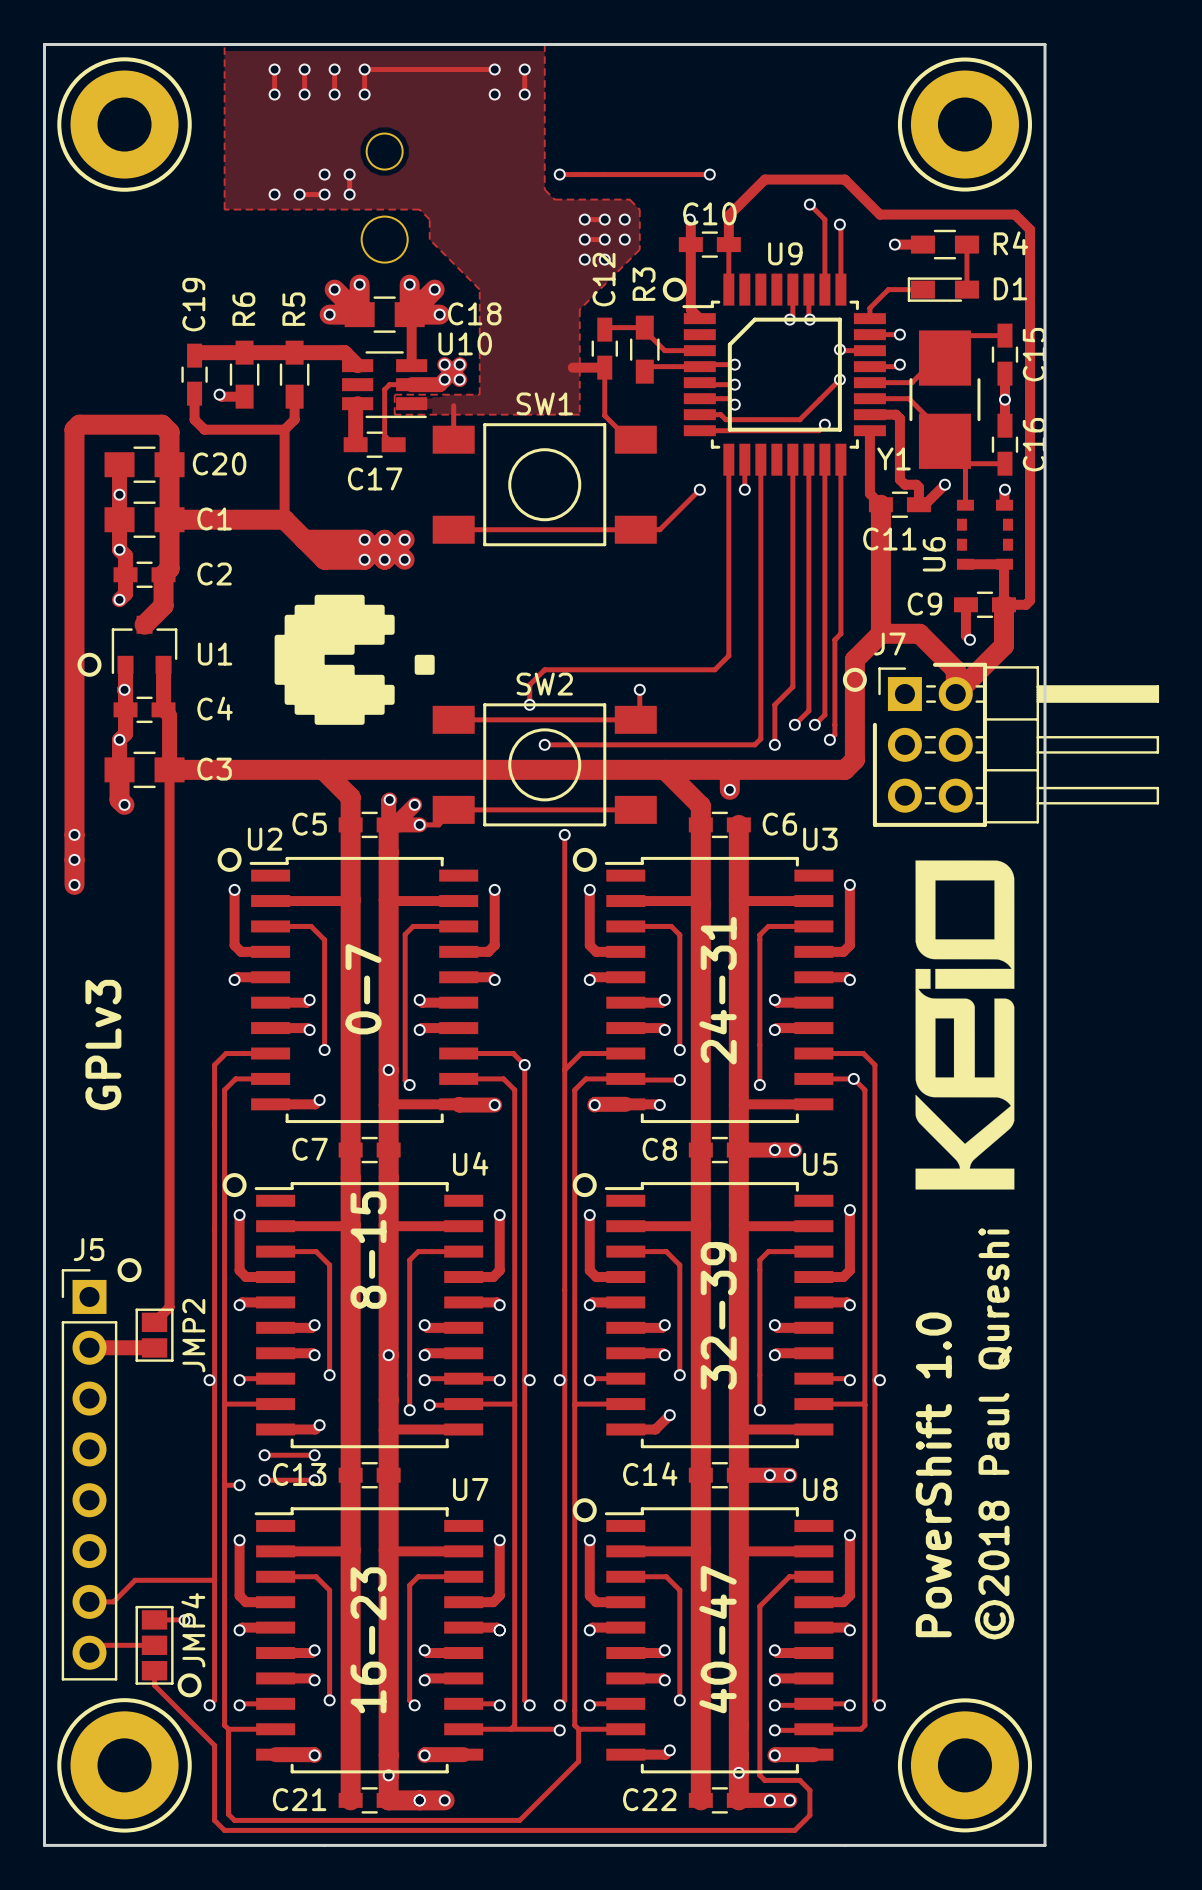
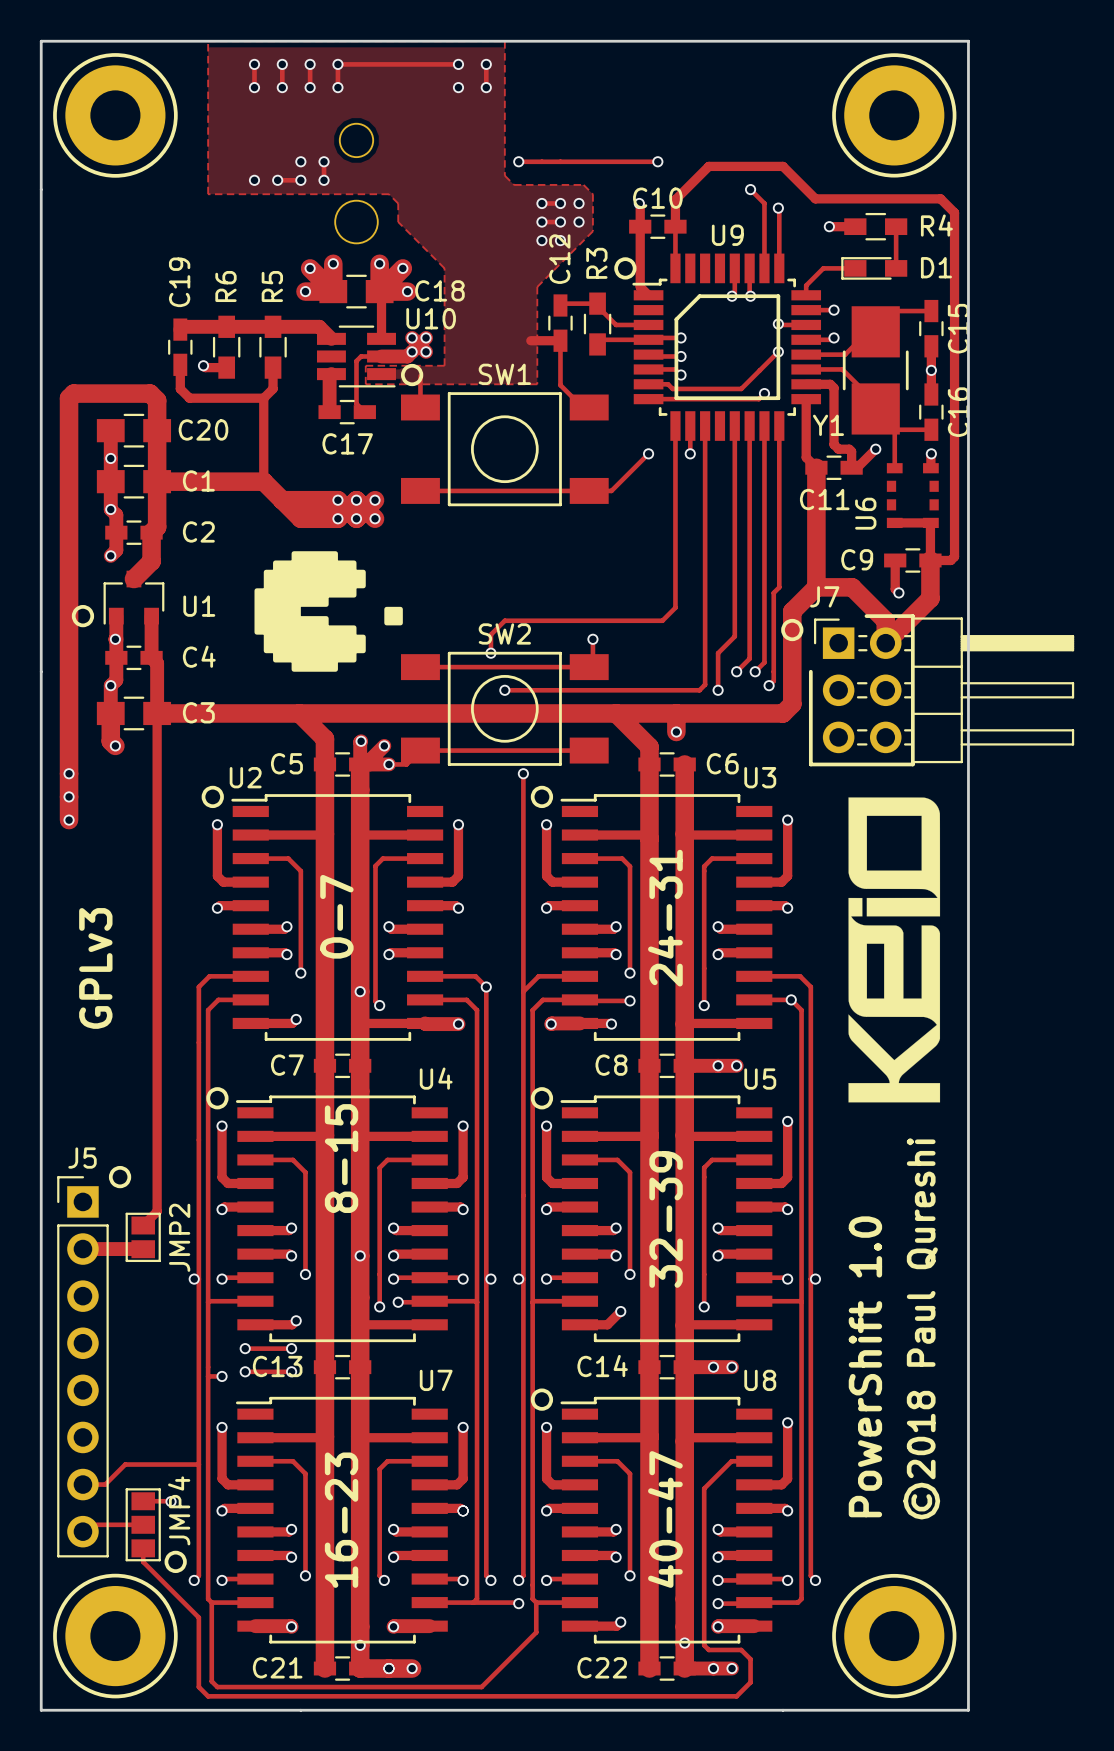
drawing: none -> [400, 363, 424, 387]

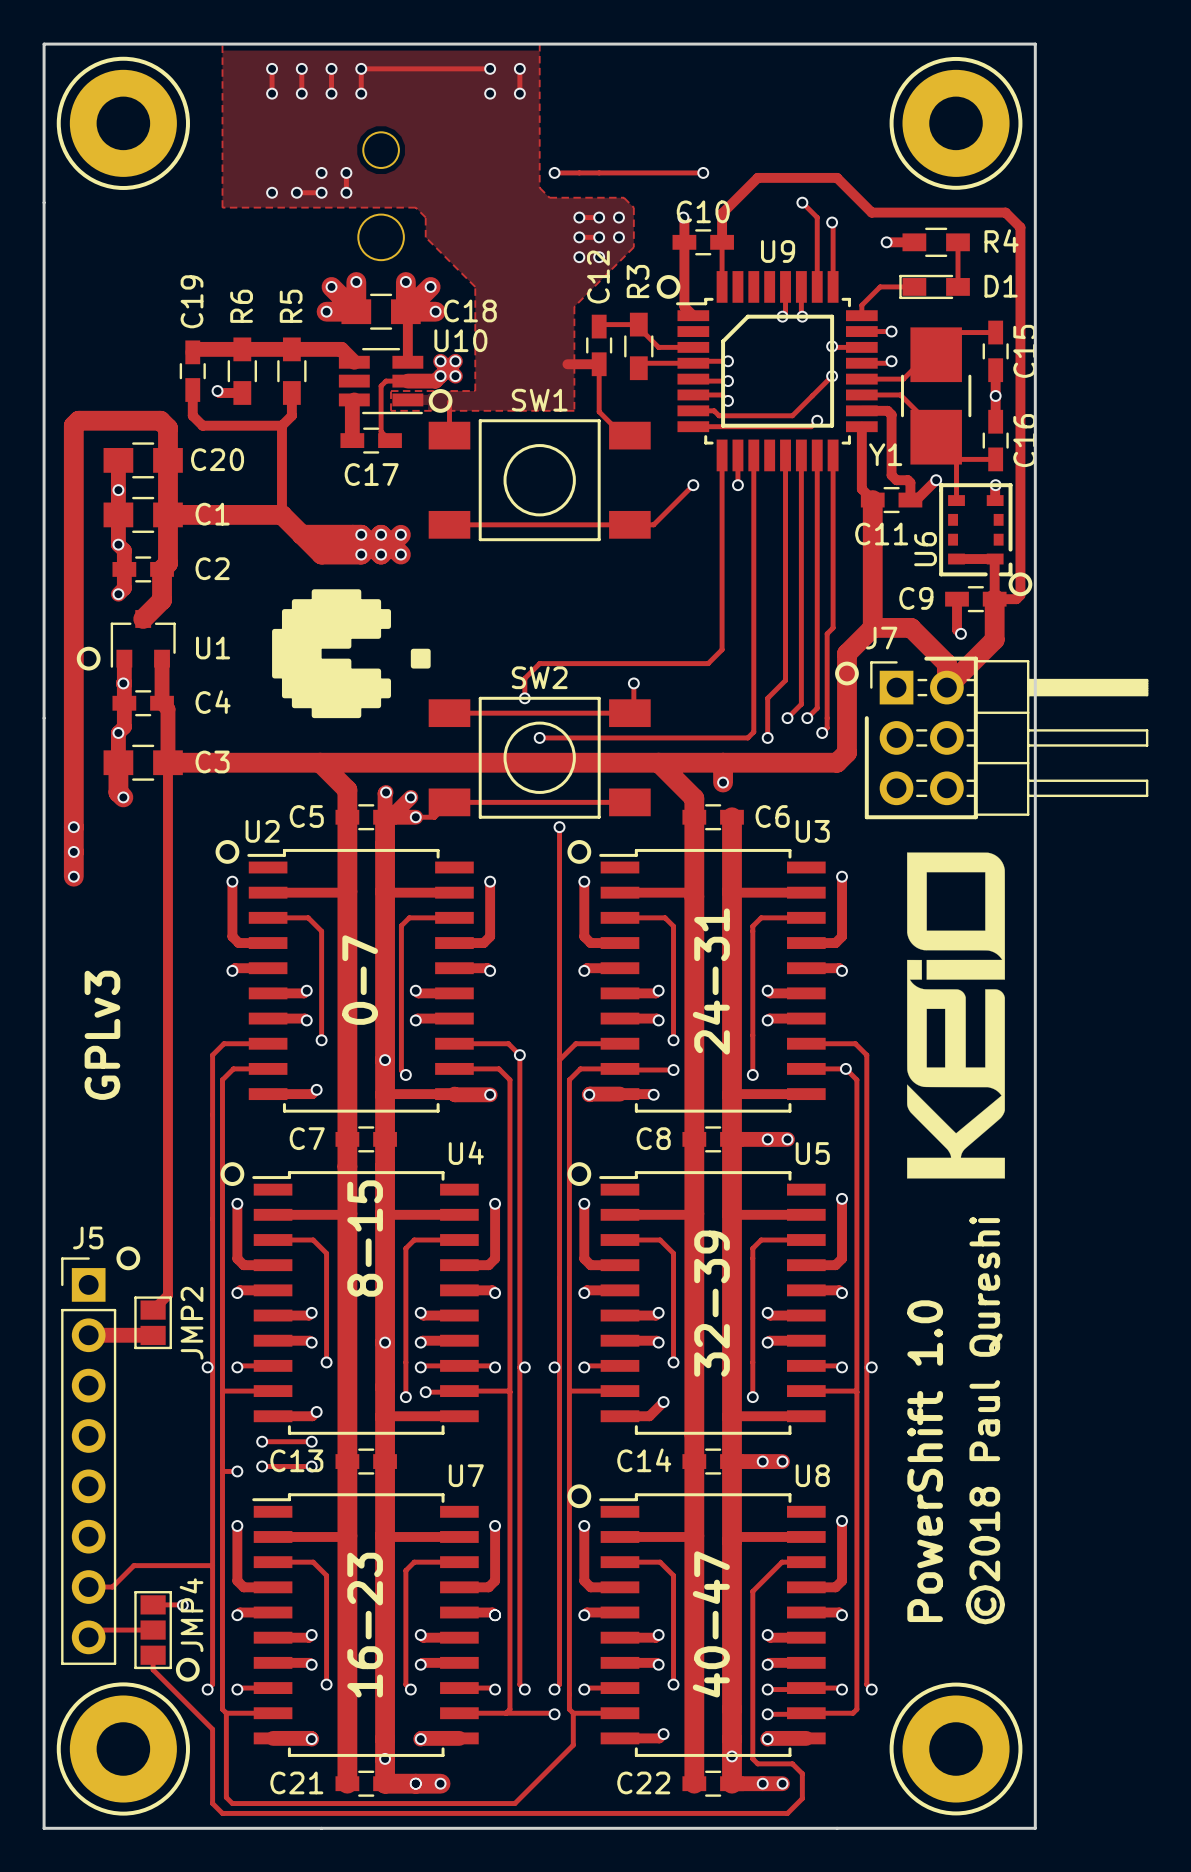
line: none -> (1010, 549) (1010, 485) (941, 485) (941, 574) (985, 574)
line: none -> (1010, 564) (1010, 574) (1000, 574)
drawing: none -> [1008, 572, 1033, 597]

